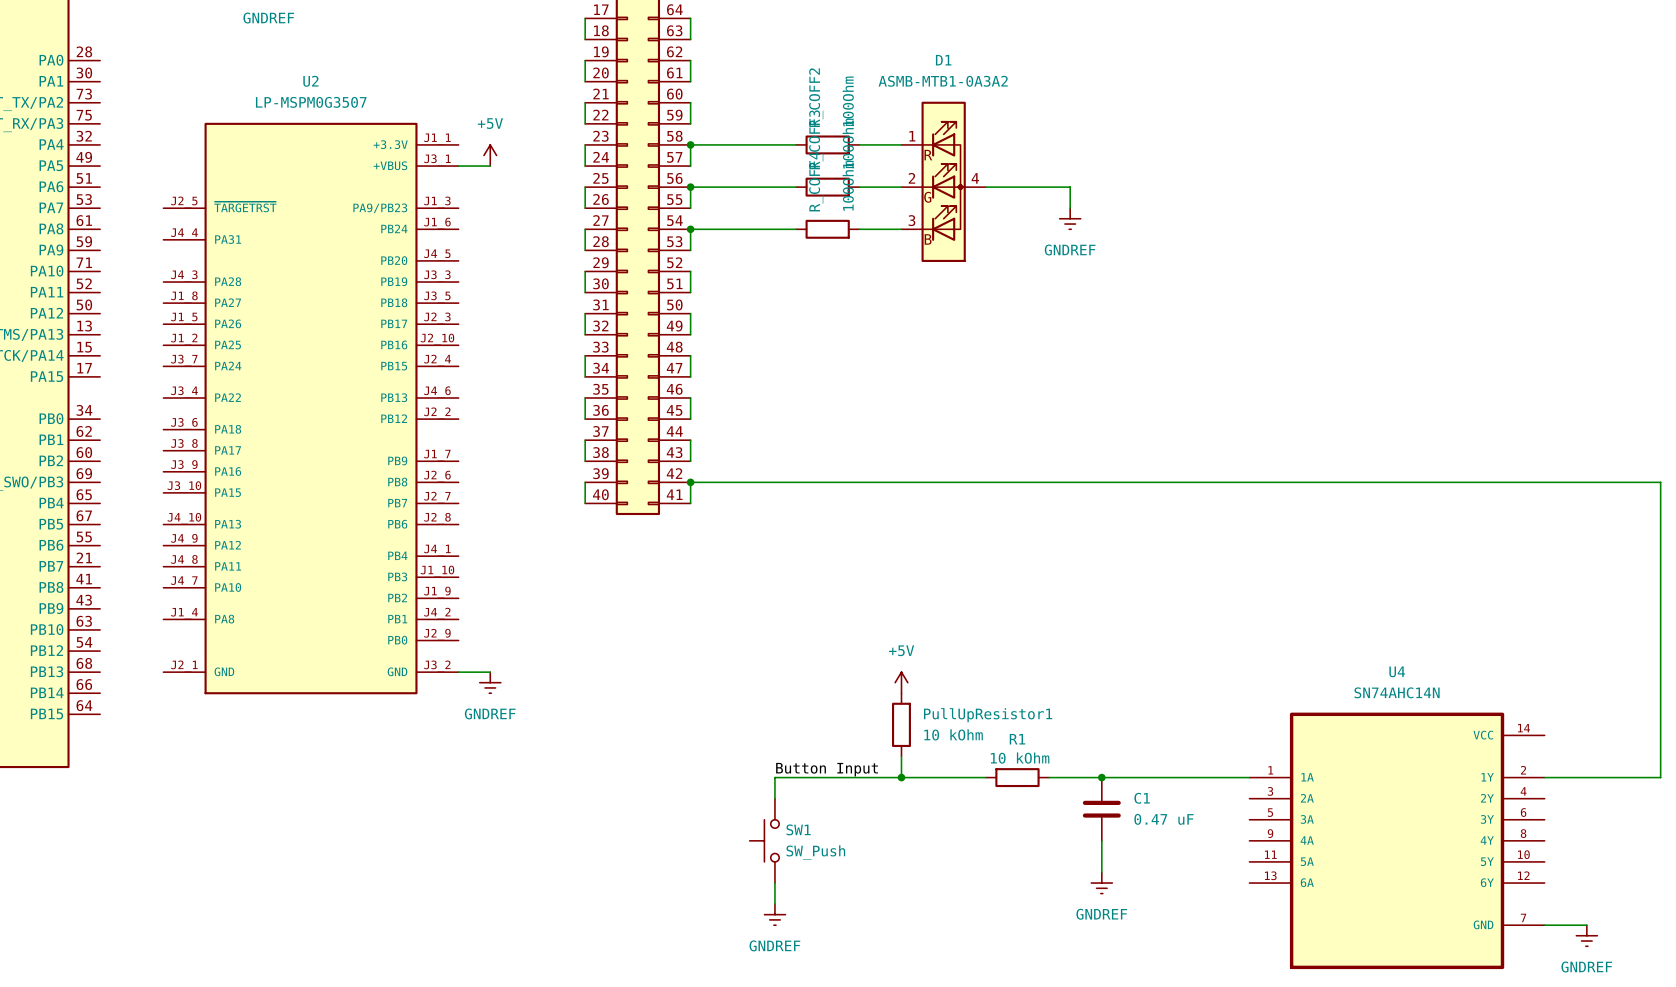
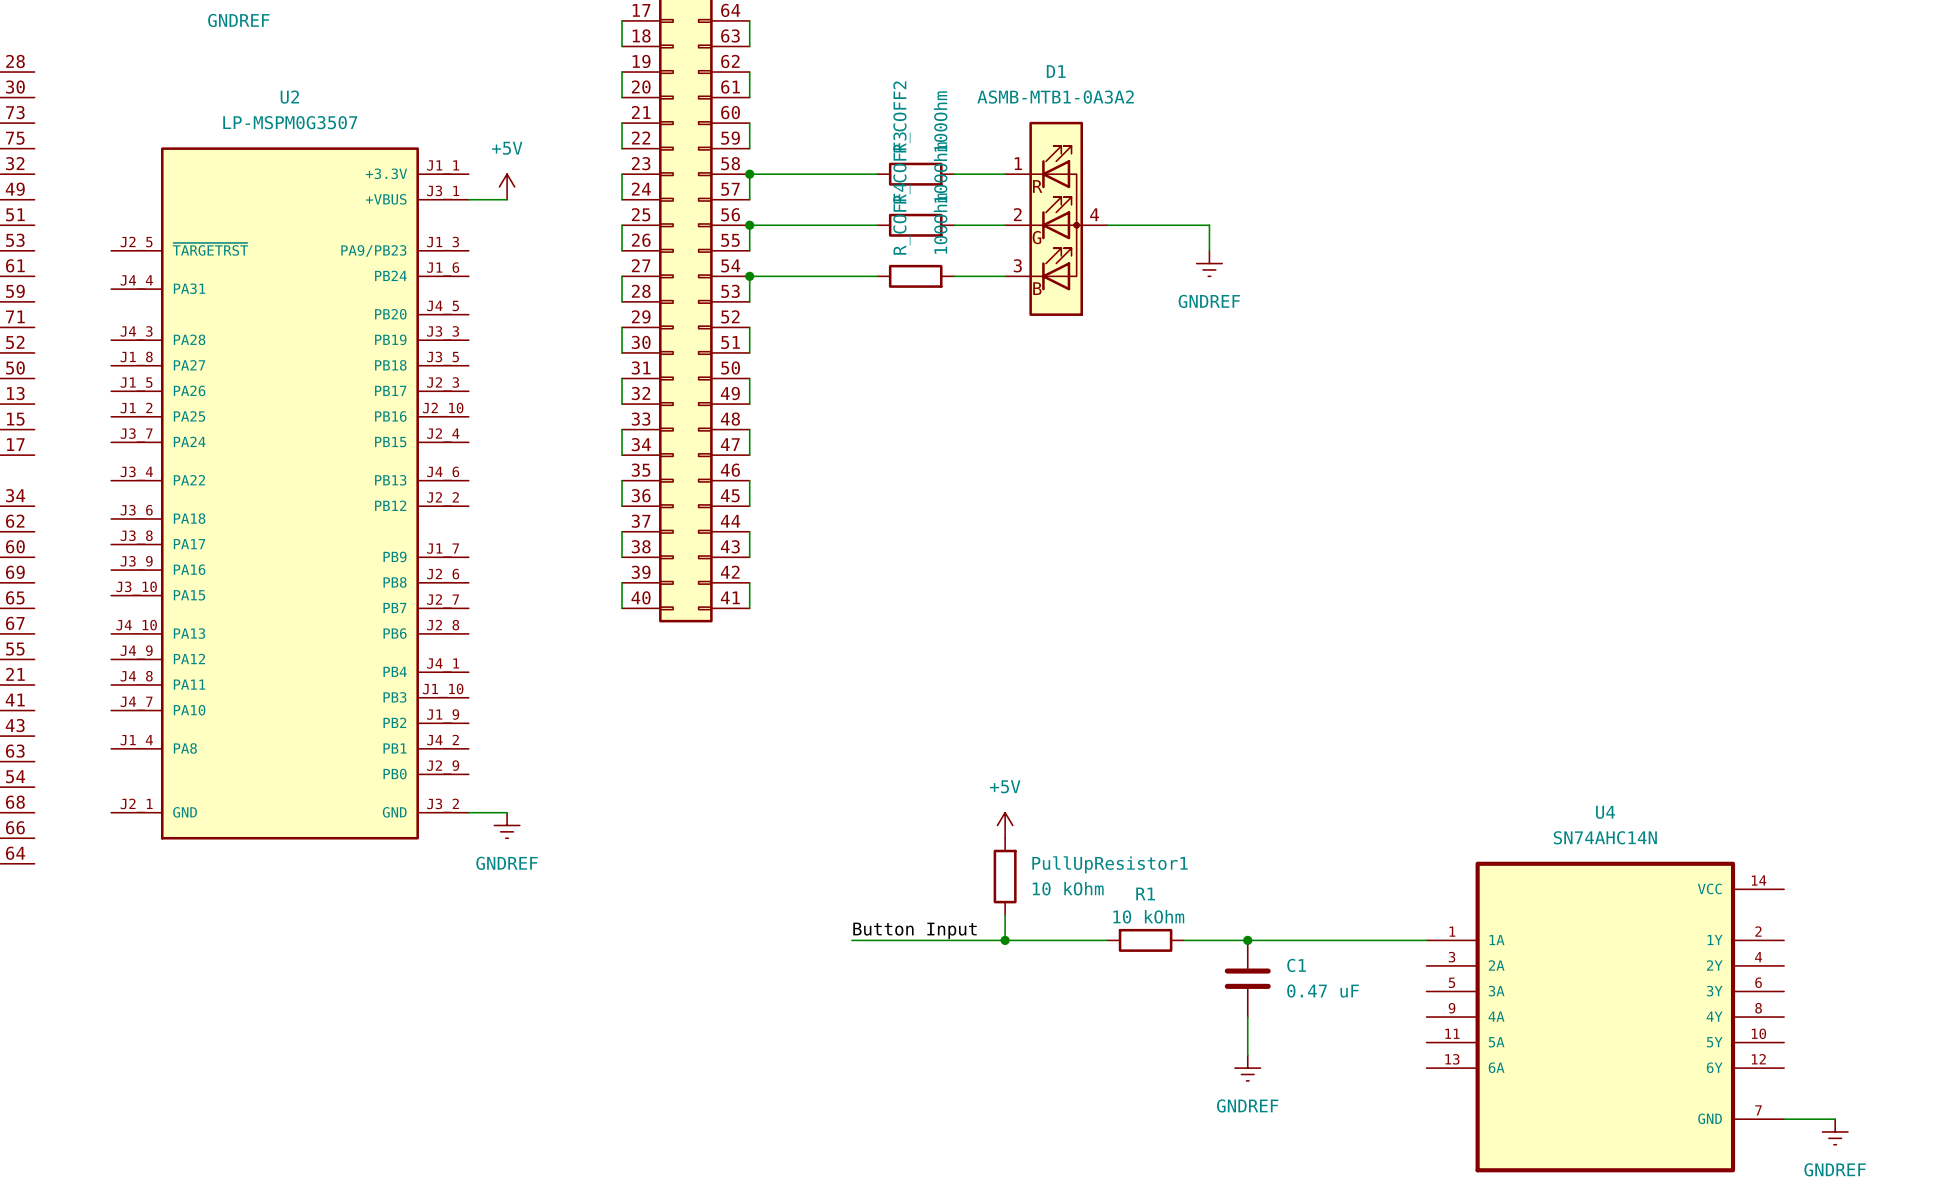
wire: (690, 482) (1660, 482) (1660, 777) (1544, 777) -> none
junction: (690, 482) -> none
wire: (774, 777) (774, 798) -> none
SW1: SW_Push (764, 840) -> none
wire: (774, 883) (774, 904) -> none
power symbol: GNDREF (774, 914) -> none

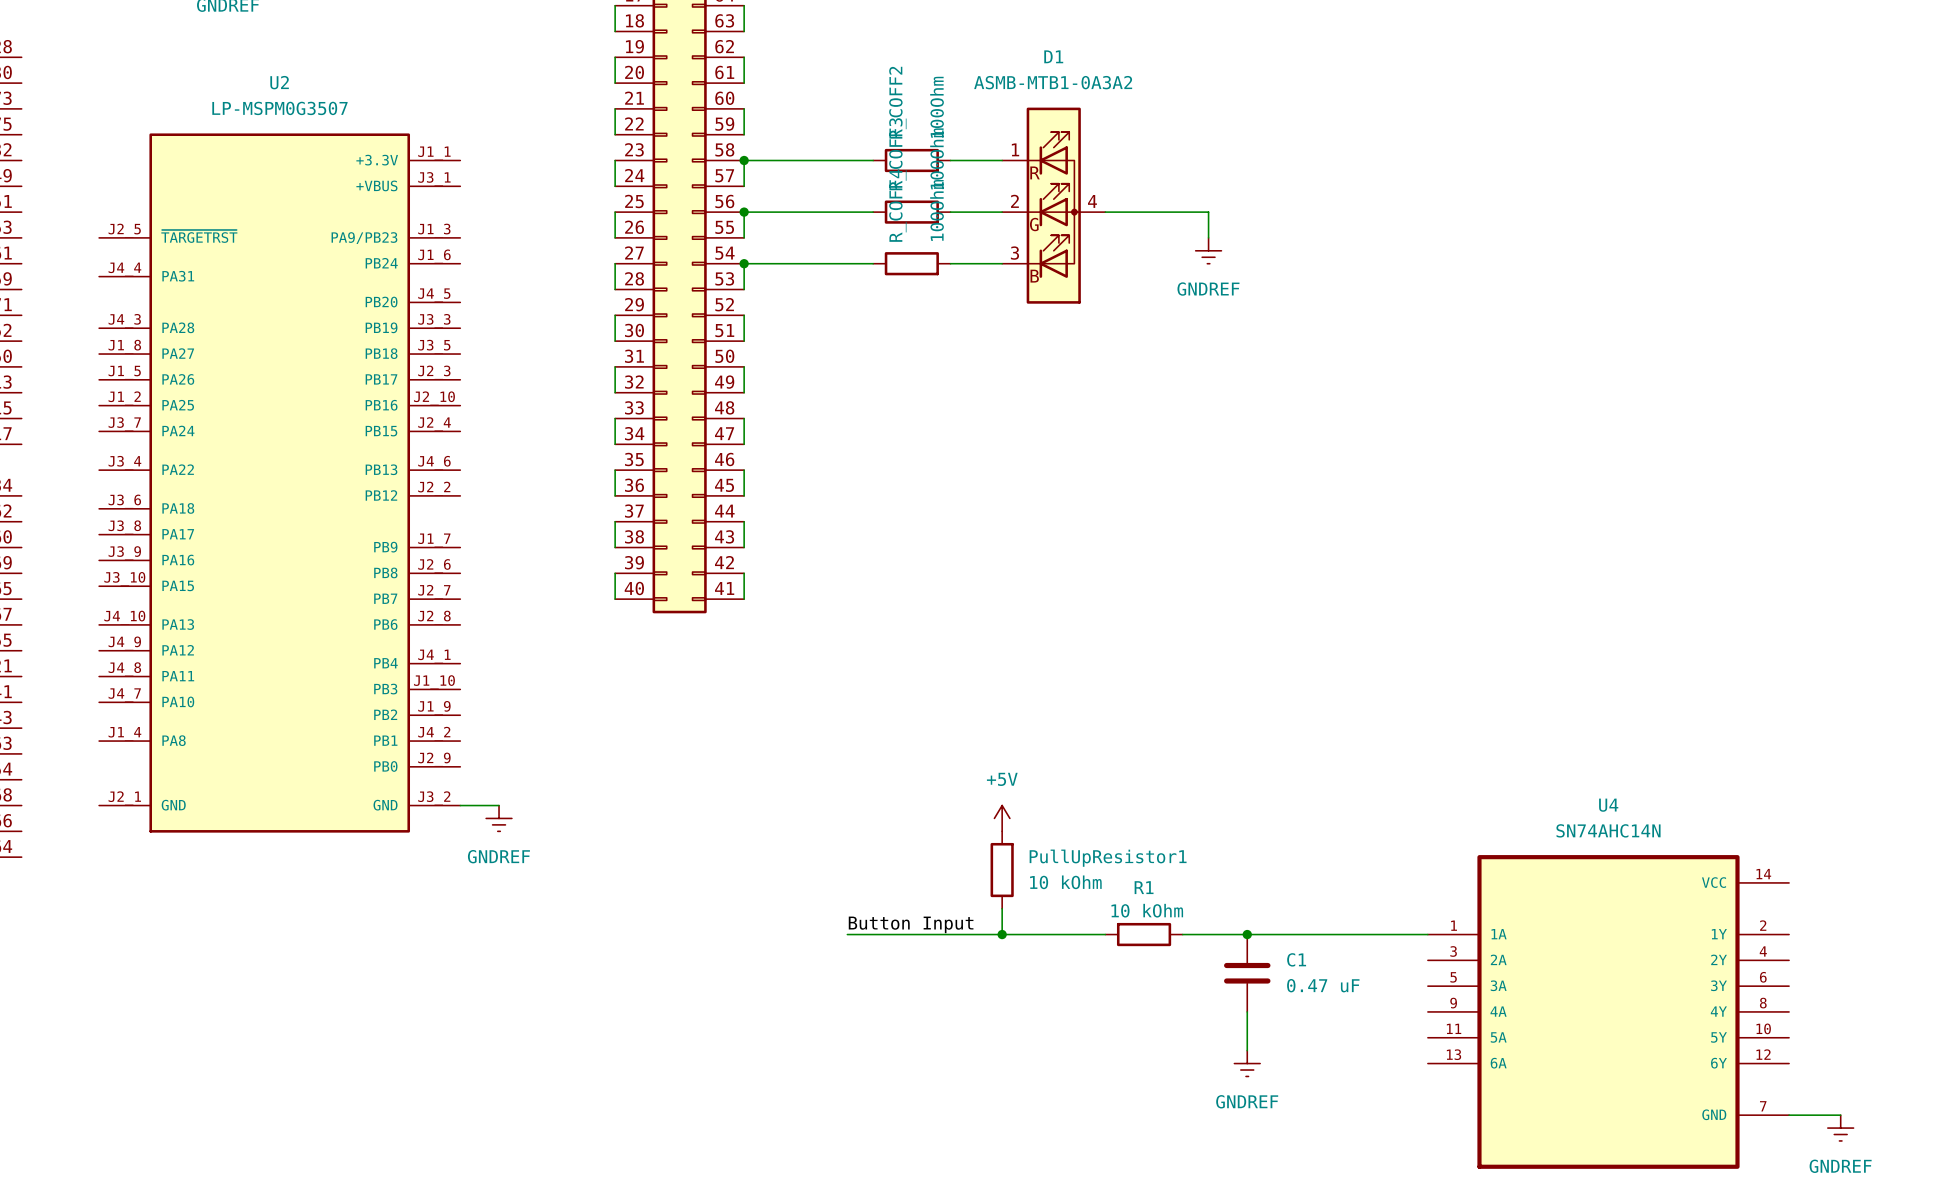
power symbol: +5V (507, 186) -> none
wire: (468, 199) (507, 199) -> none

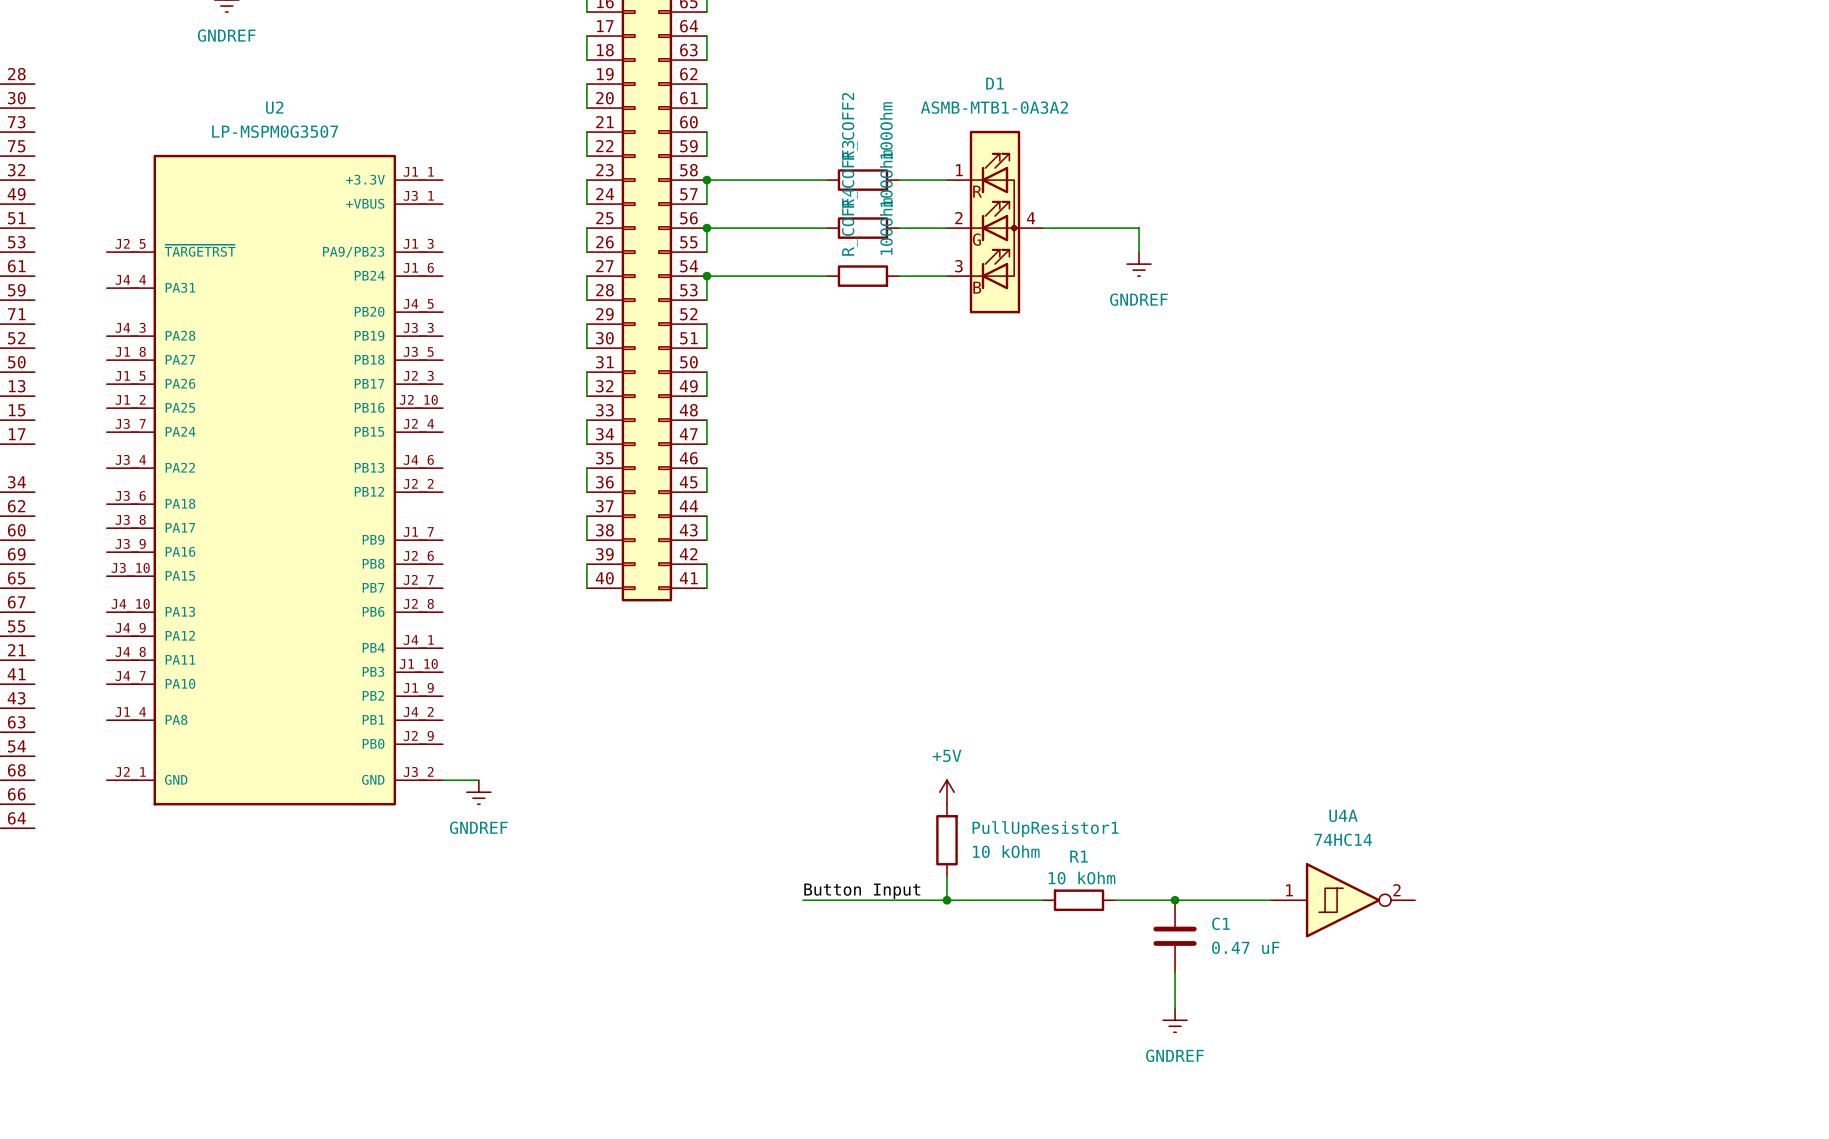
U4A: none -> 74HC14 (1343, 900)
U4: SN74AHC14N (1608, 1011) -> none
wire: (1789, 1115) (1840, 1115) -> none
power symbol: GNDREF (1840, 1128) -> none

